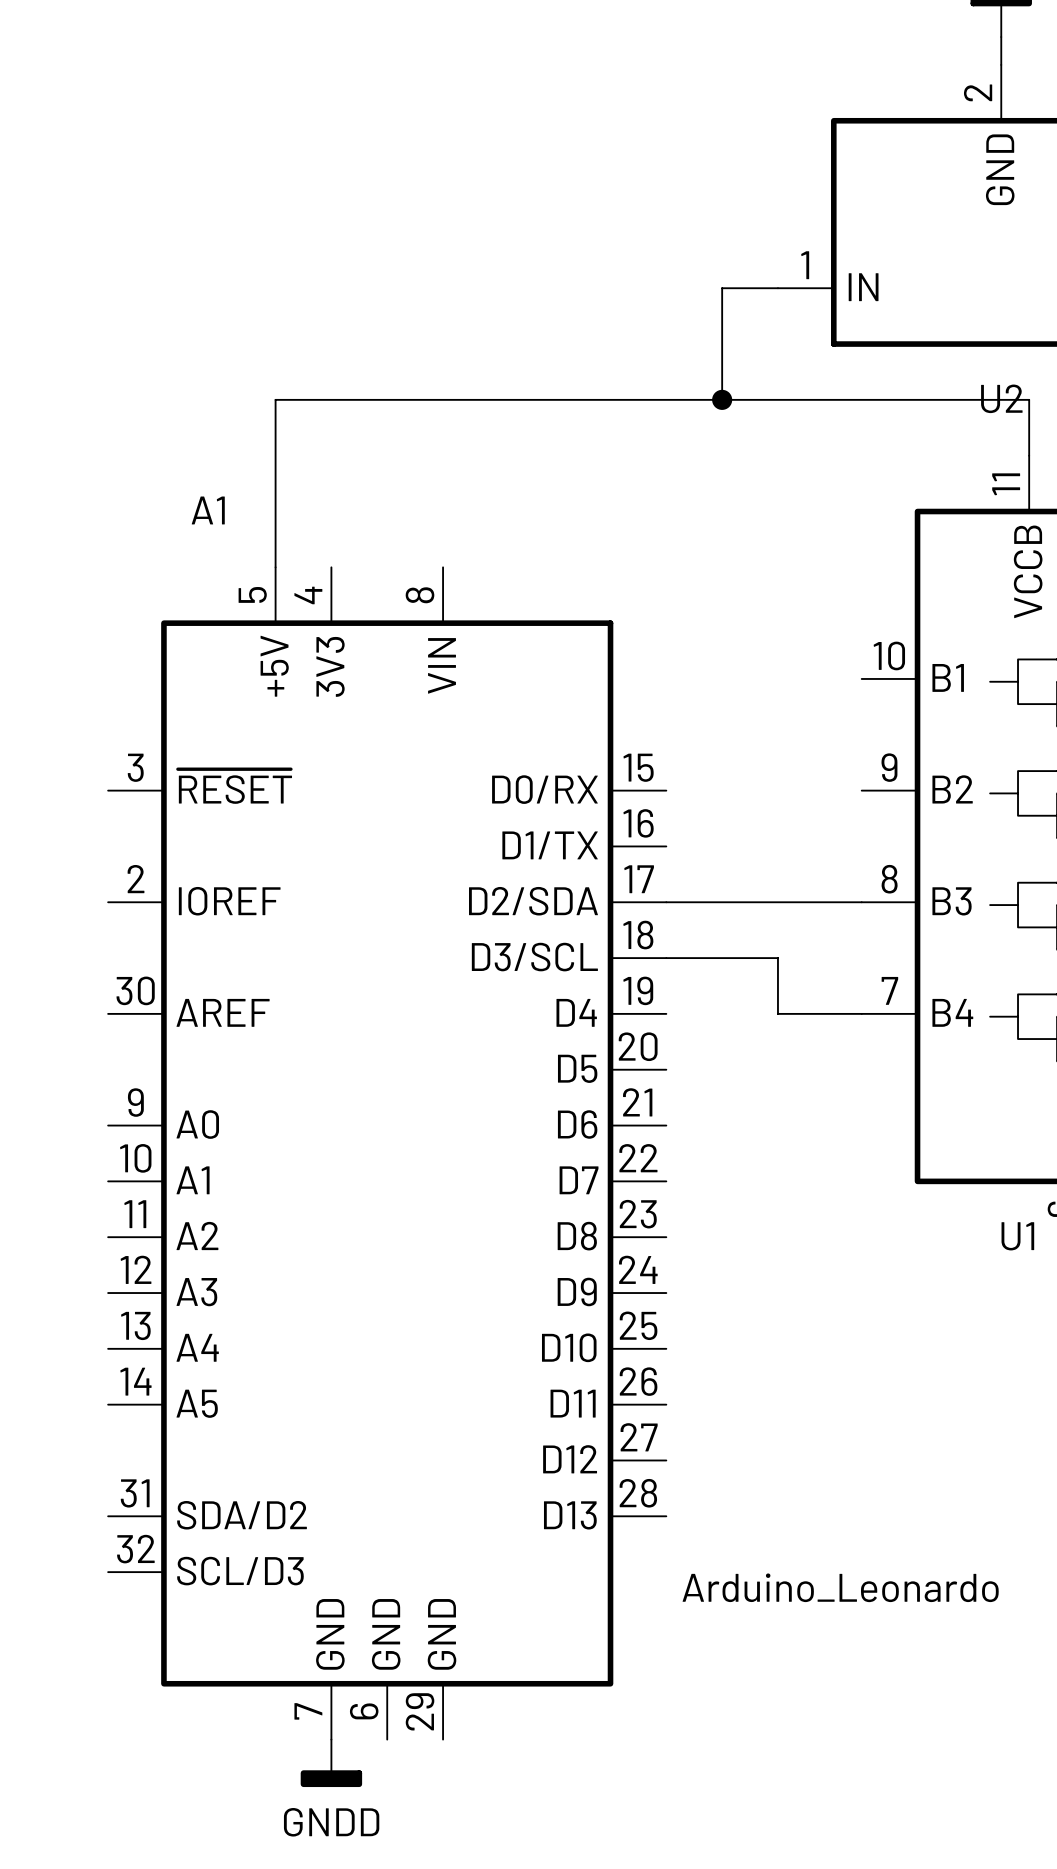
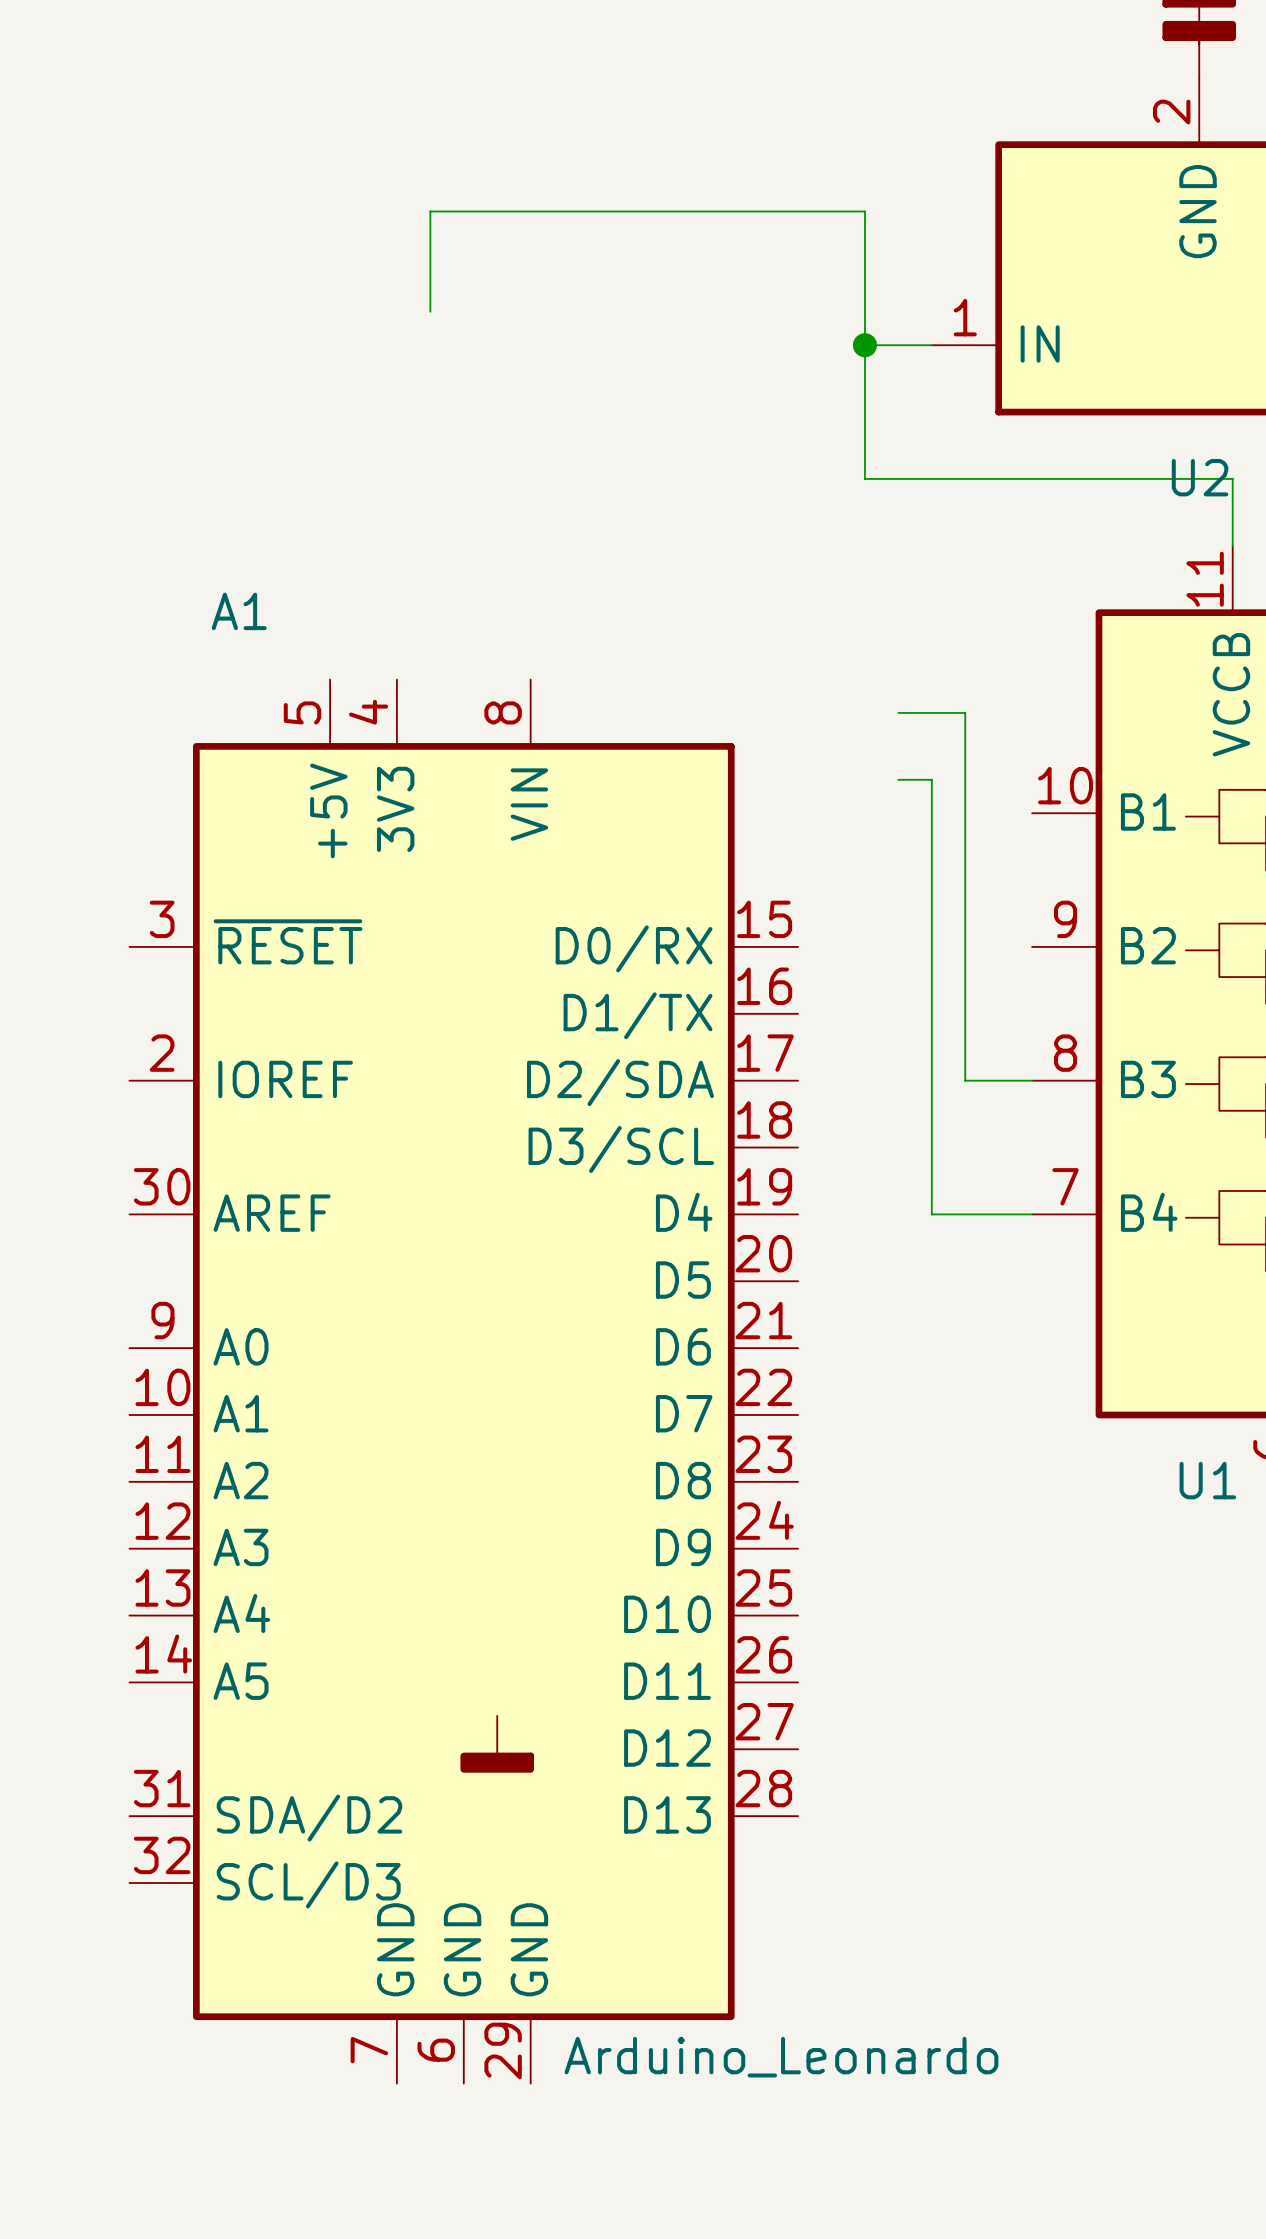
power symbol: none -> (1199, 49)
wire: none -> (430, 311) (430, 211) (864, 211) (864, 345)
wire: (722, 399) (275, 399) (275, 567) -> none
junction position: (722, 399) -> (864, 345)
wire: (666, 902) (805, 902) -> (898, 712) (965, 712) (965, 1080)
wire: (666, 958) (777, 958) -> (898, 779) (931, 779) (931, 1147)
power symbol: none -> (497, 1744)
A1 value position: Arduino_Leonardo (840, 1587) -> Arduino_Leonardo (781, 2057)
power symbol: GNDD (331, 1763) -> none

